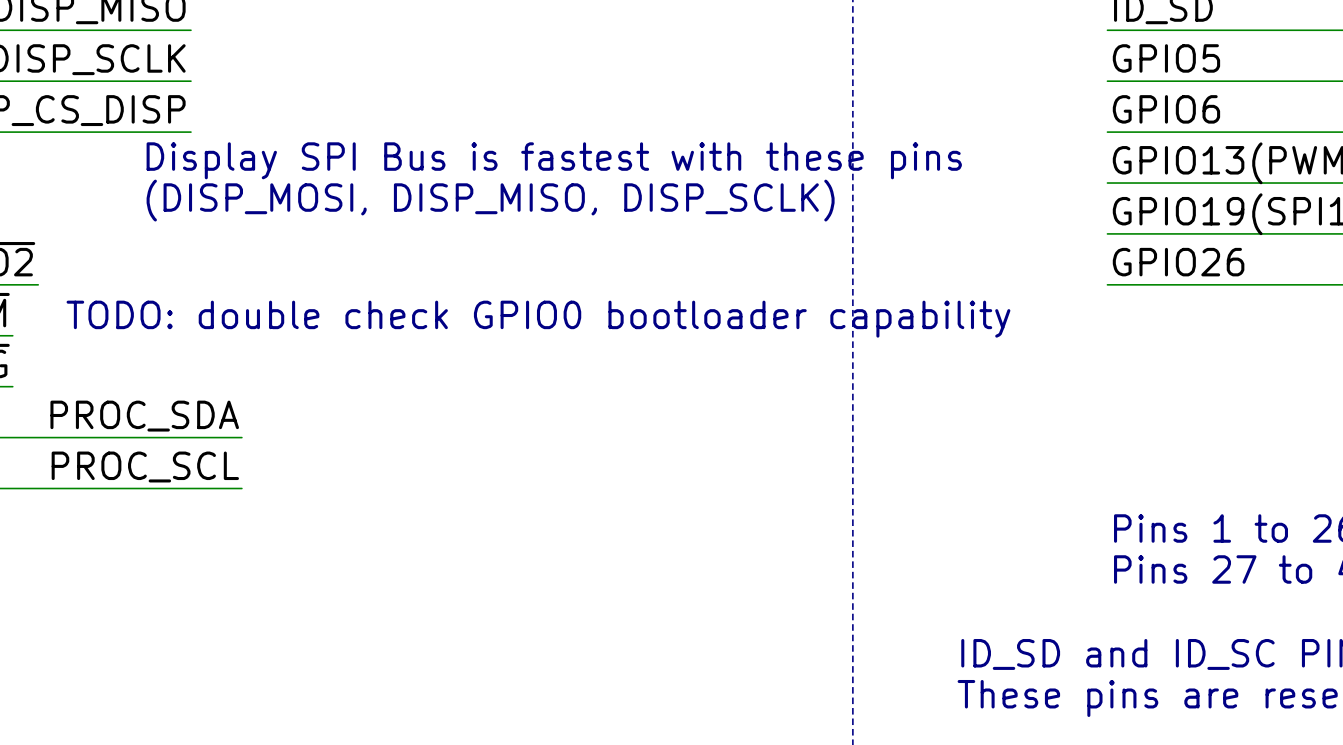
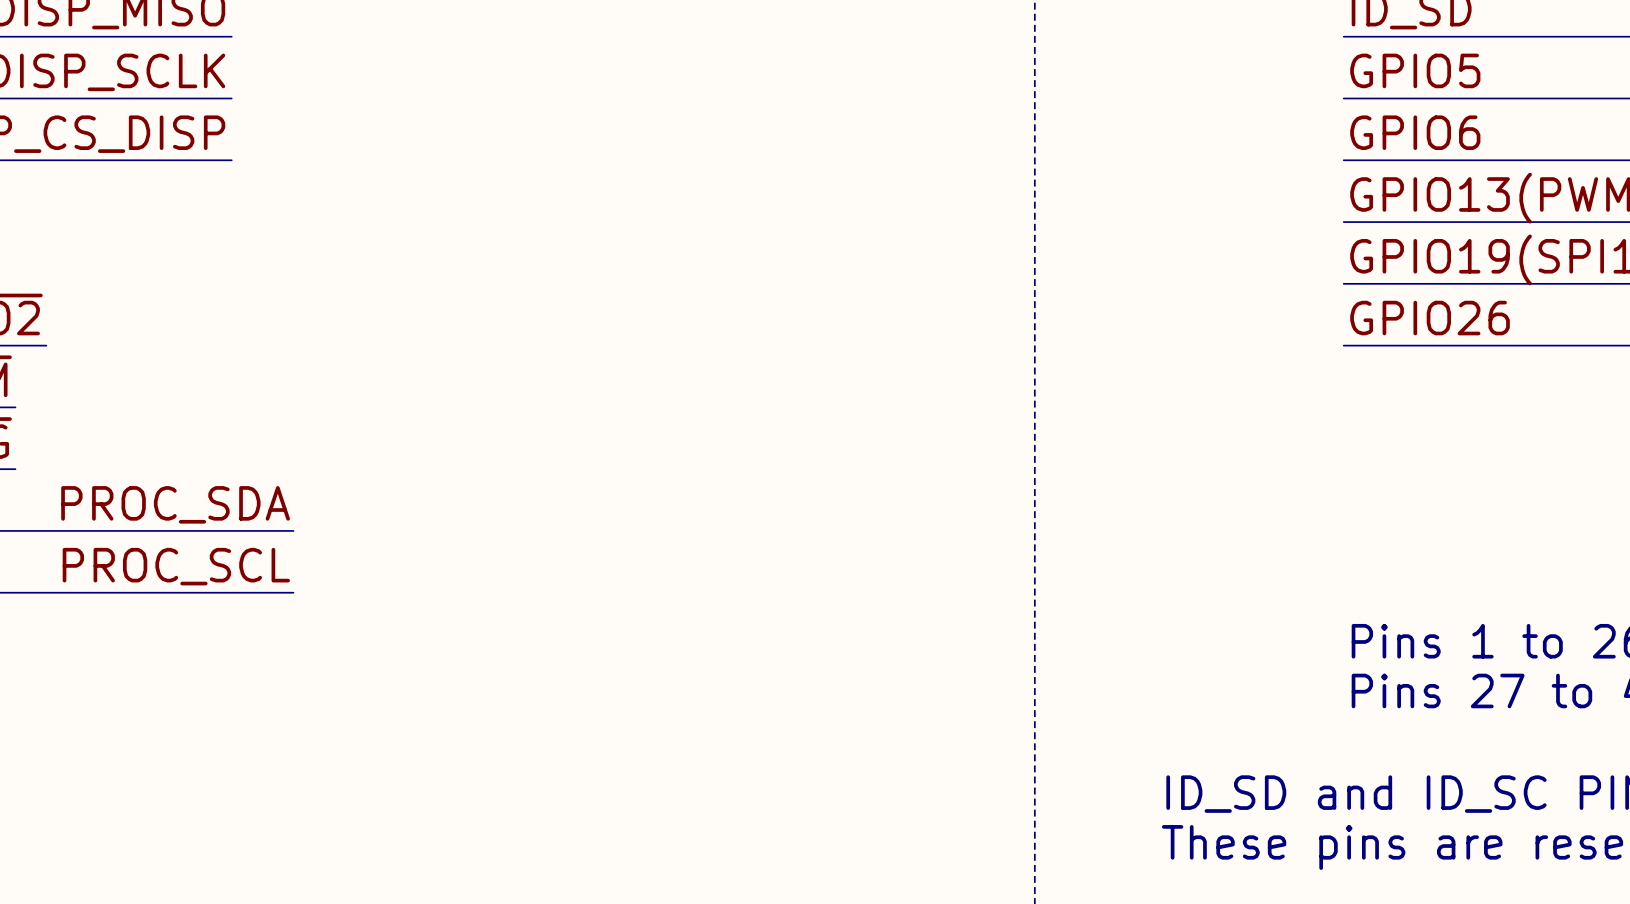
text: Display SPI Bus is fastest with these pins (554, 160) -> none
text: (DISP_MOSI, DISP_MISO, DISP_SCLK) (490, 200) -> none
text: TODO: double check GPIO0 bootloader capability (538, 319) -> none

